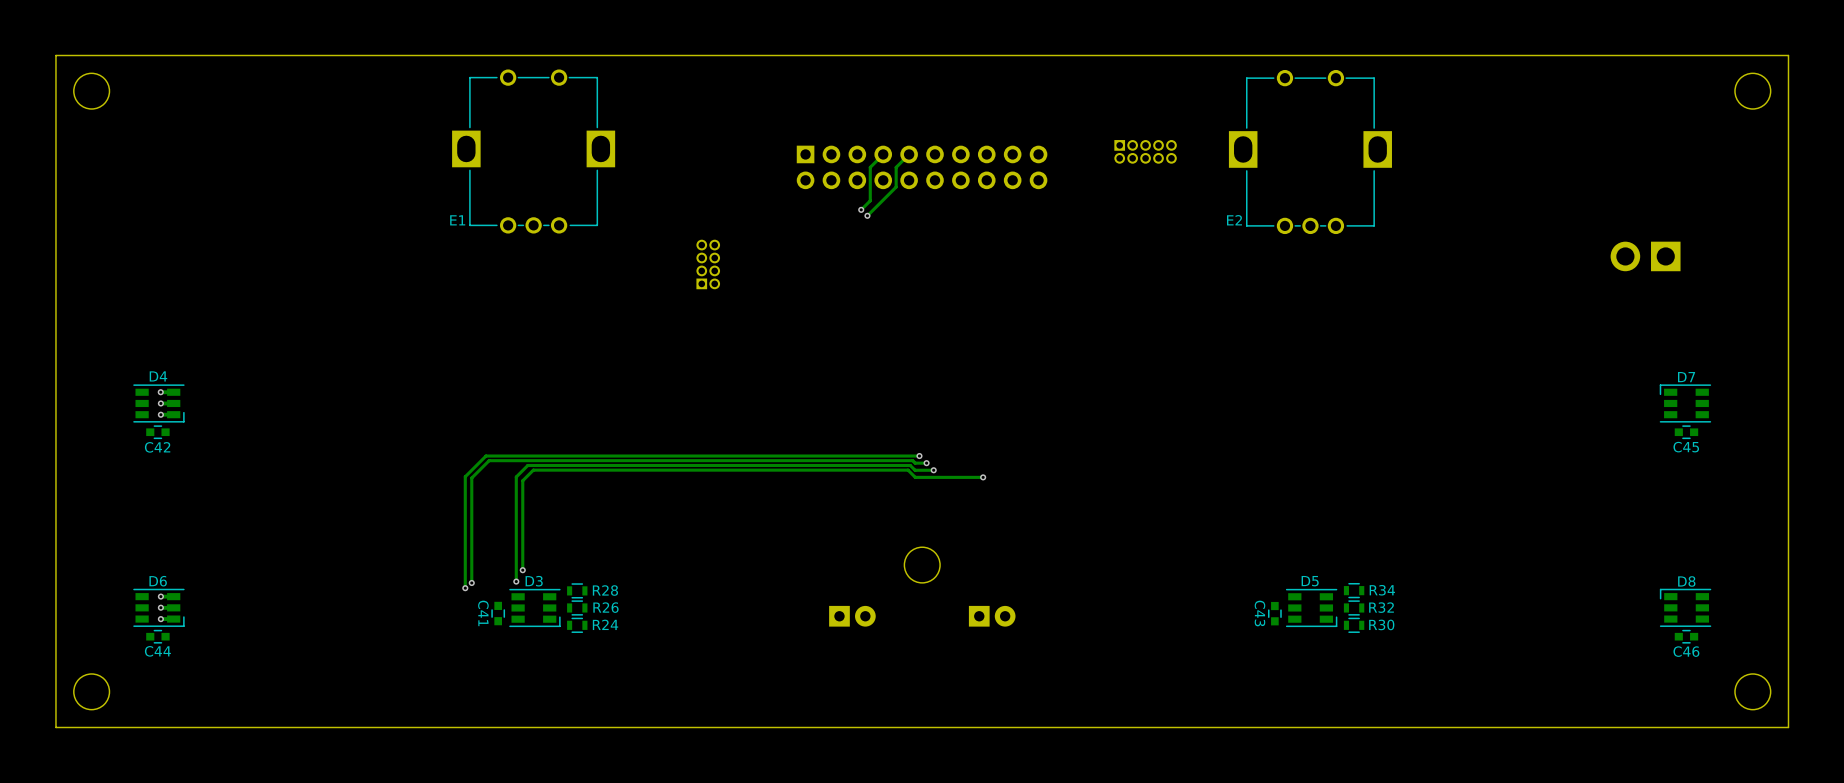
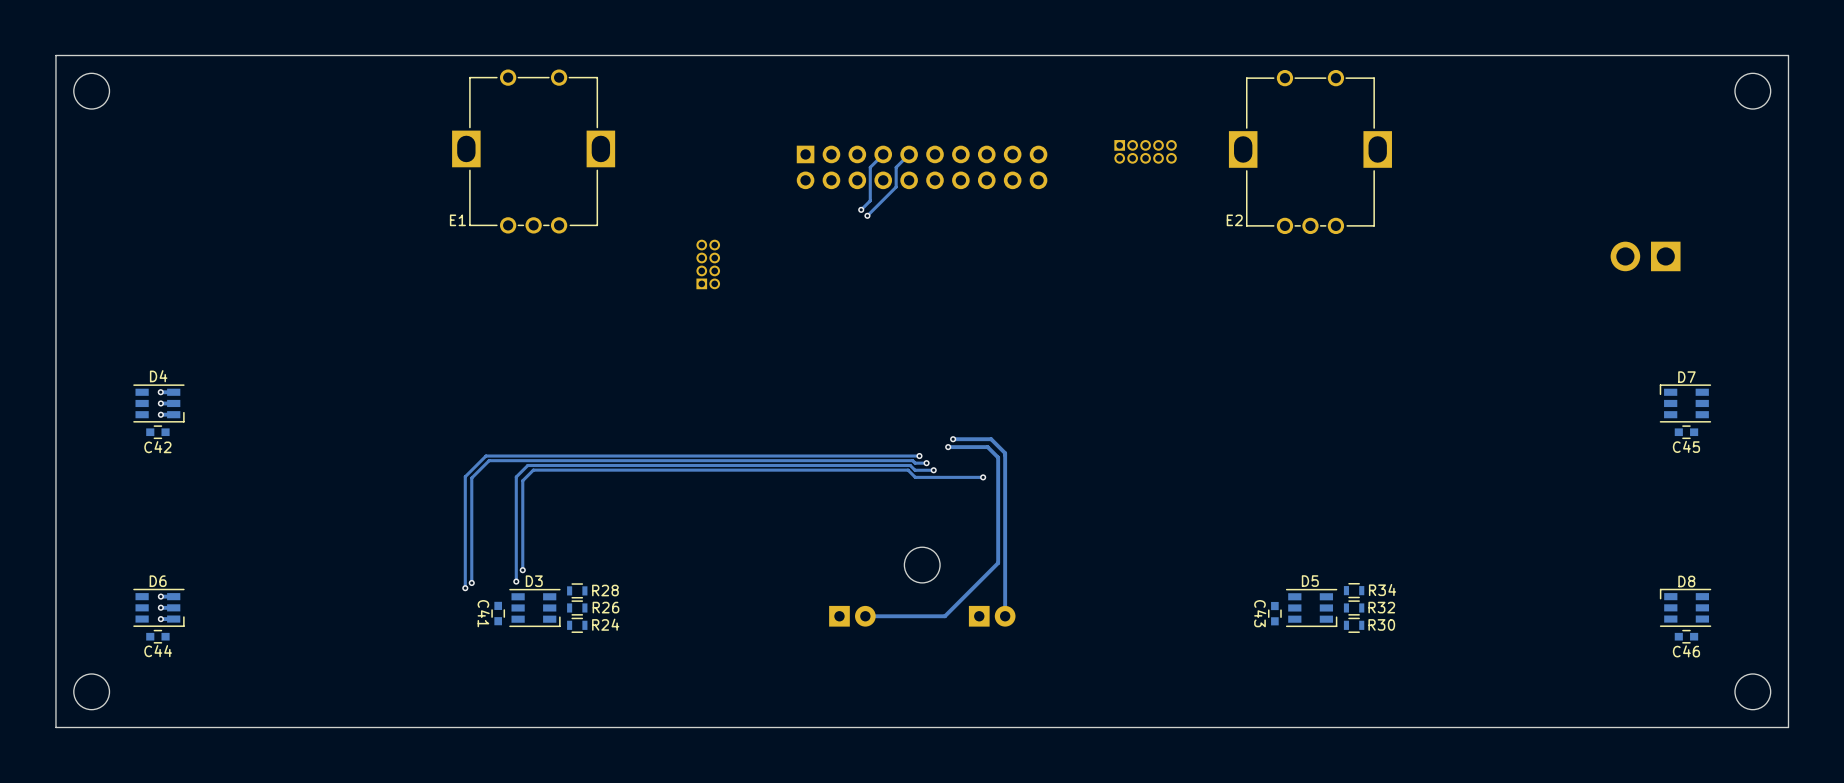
track: none -> (953, 439) (991, 439) (1005, 453) (1005, 616)
via: none -> (953, 439)
track: none -> (948, 447) (987, 447) (998, 457) (998, 563) (944, 616) (865, 616)
via: none -> (948, 447)

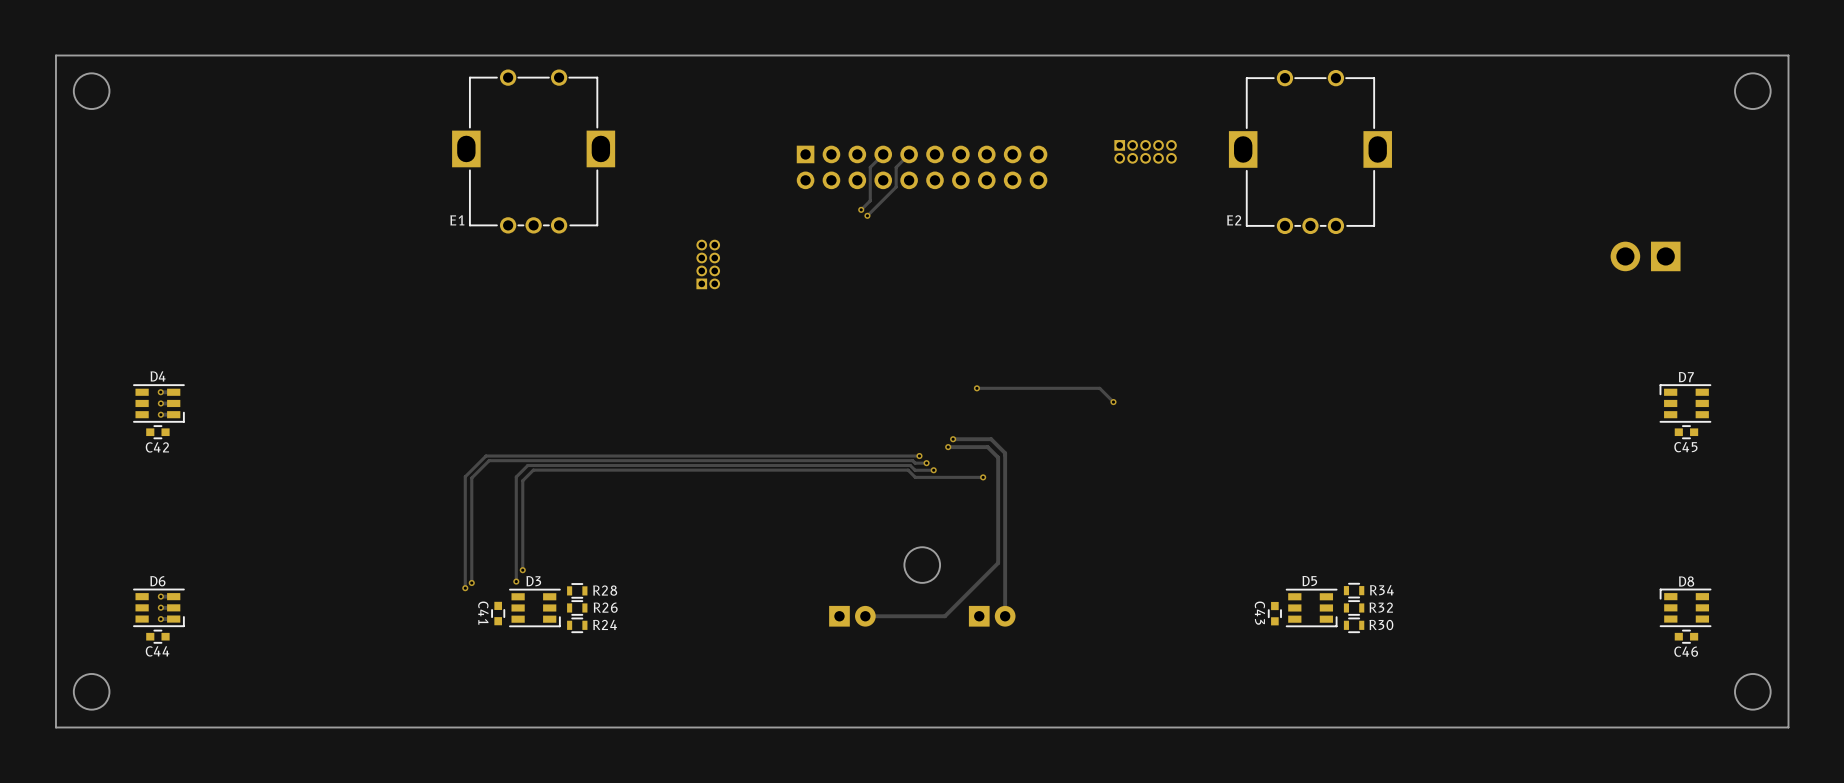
track: none -> (976, 388) (1099, 388) (1113, 402)
via: none -> (976, 388)
via: none -> (1113, 402)

